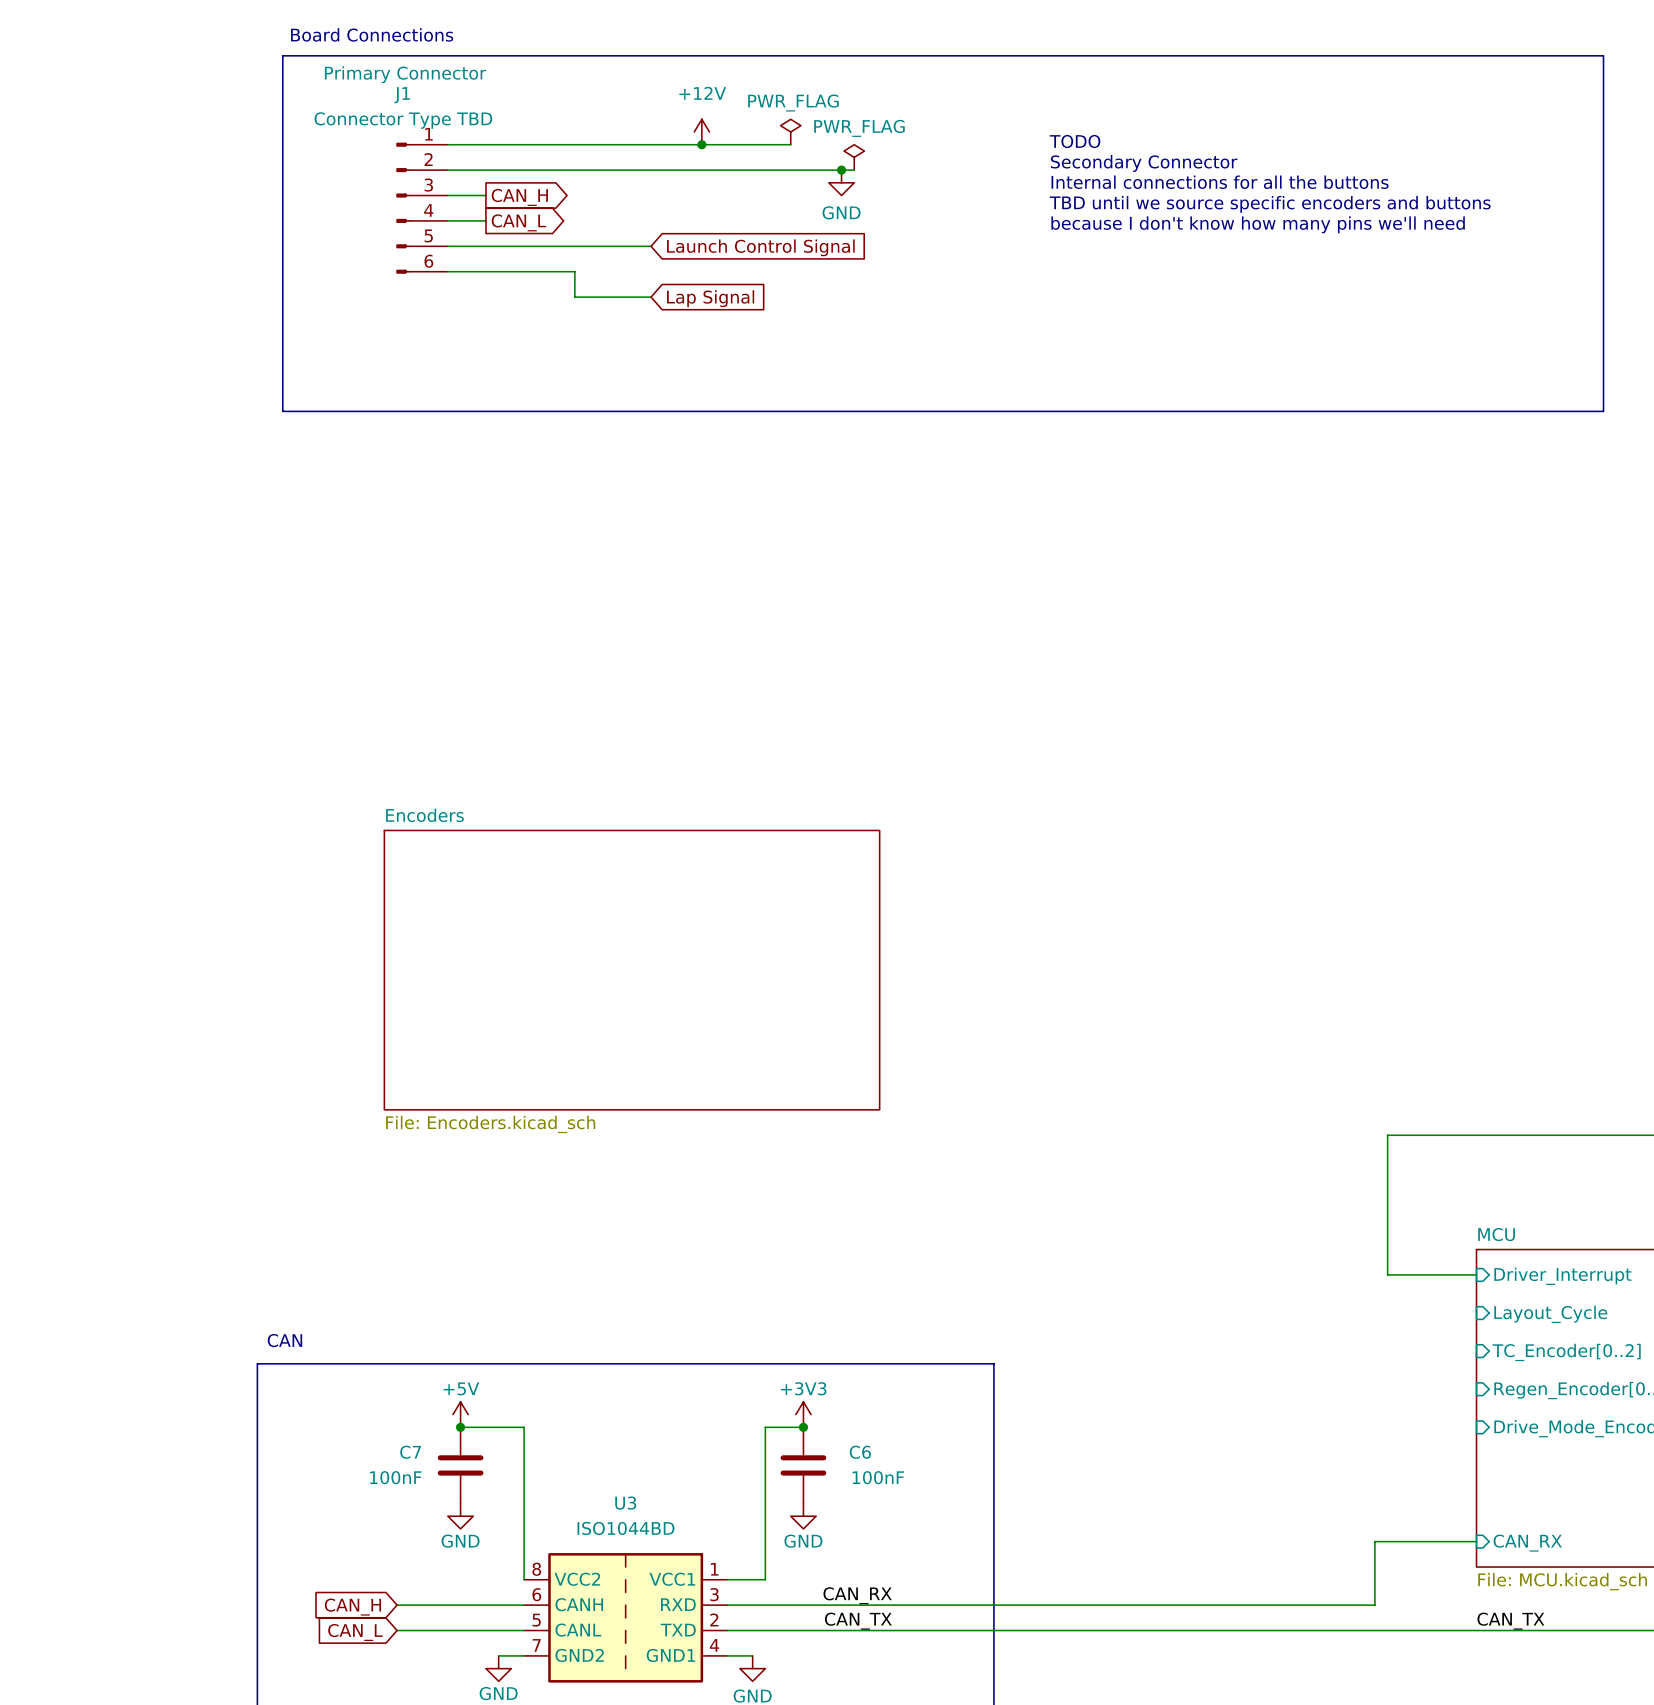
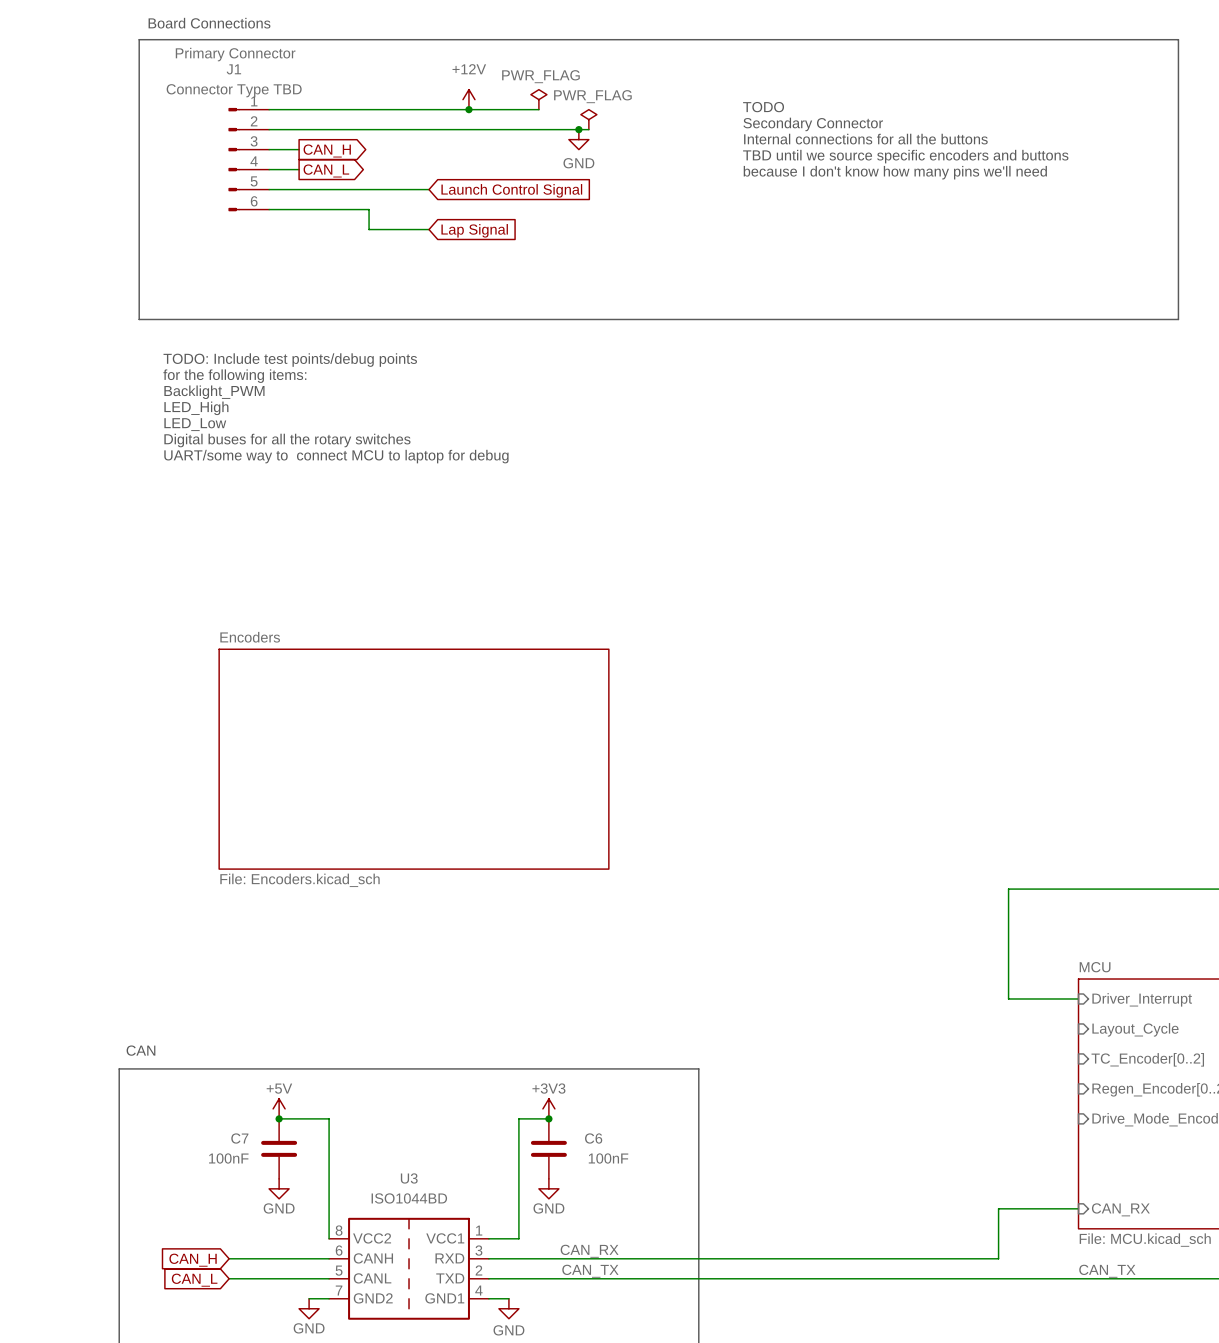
text: none -> TODO: Include test points/debug points (290, 360)
text: none -> for the following items: (234, 376)
text: none -> Backlight_PWM (214, 392)
text: none -> LED_High (196, 408)
text: none -> LED_Low (195, 424)
text: none -> Digital buses for all the rotary switches (287, 440)
text: none -> UART/some way to connect MCU to laptop for debug (336, 456)

